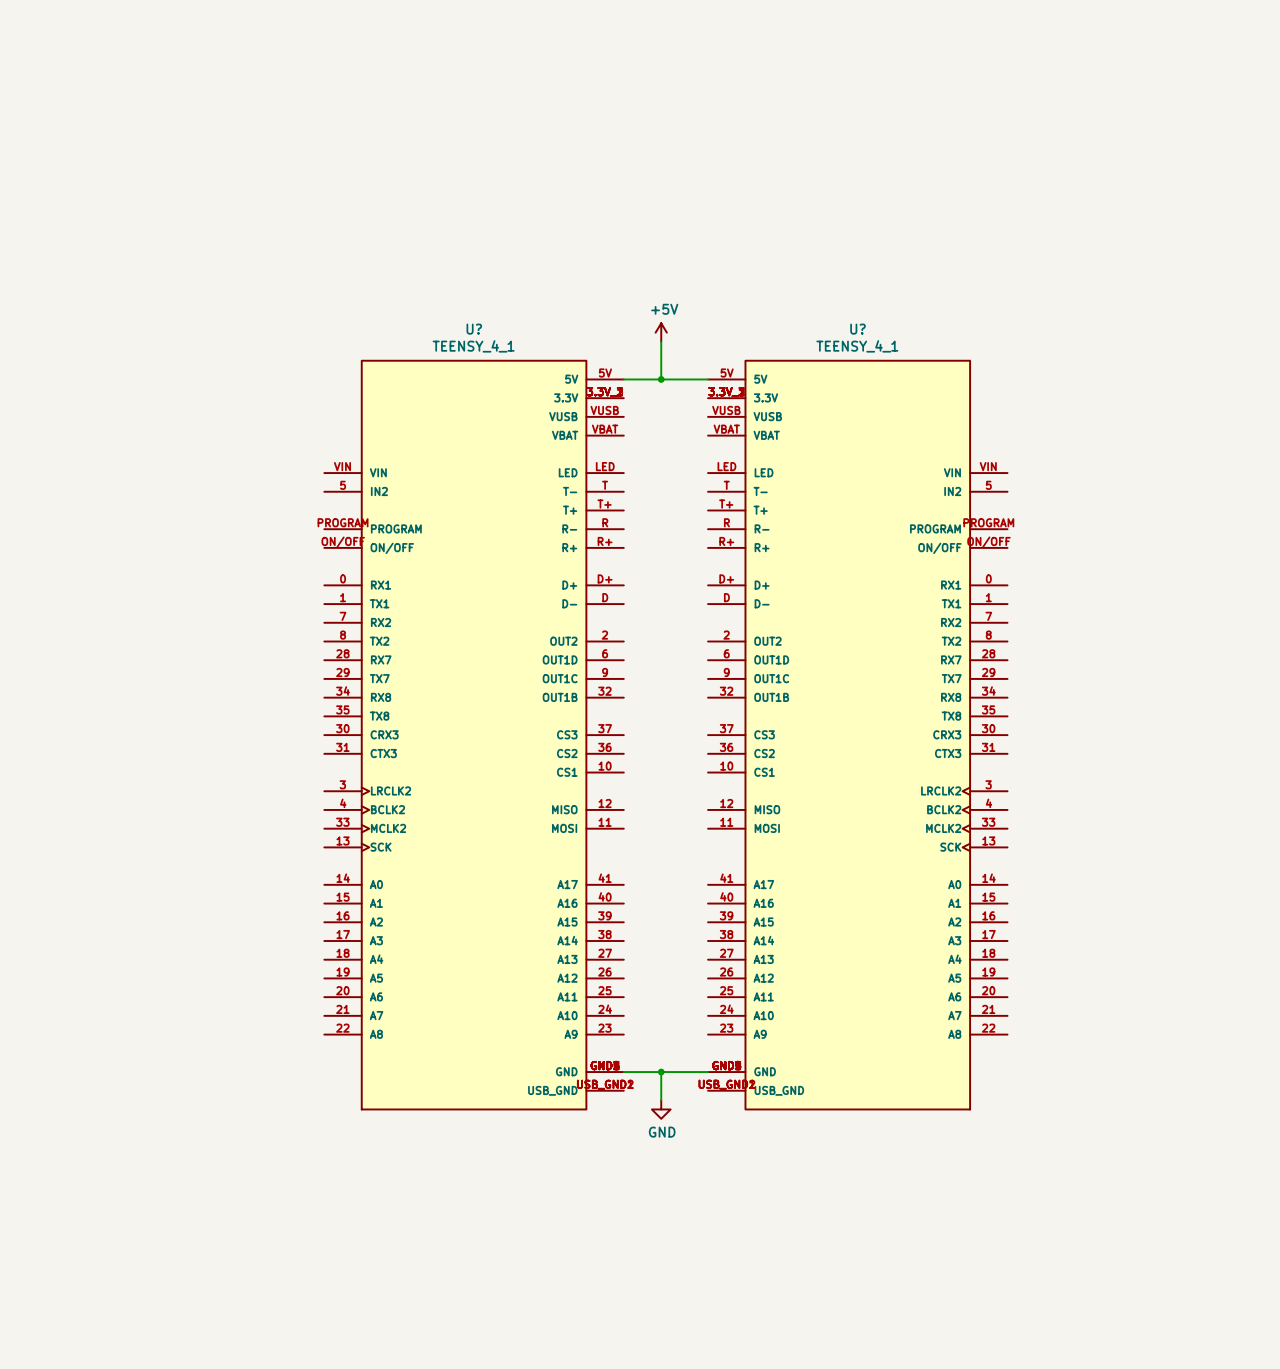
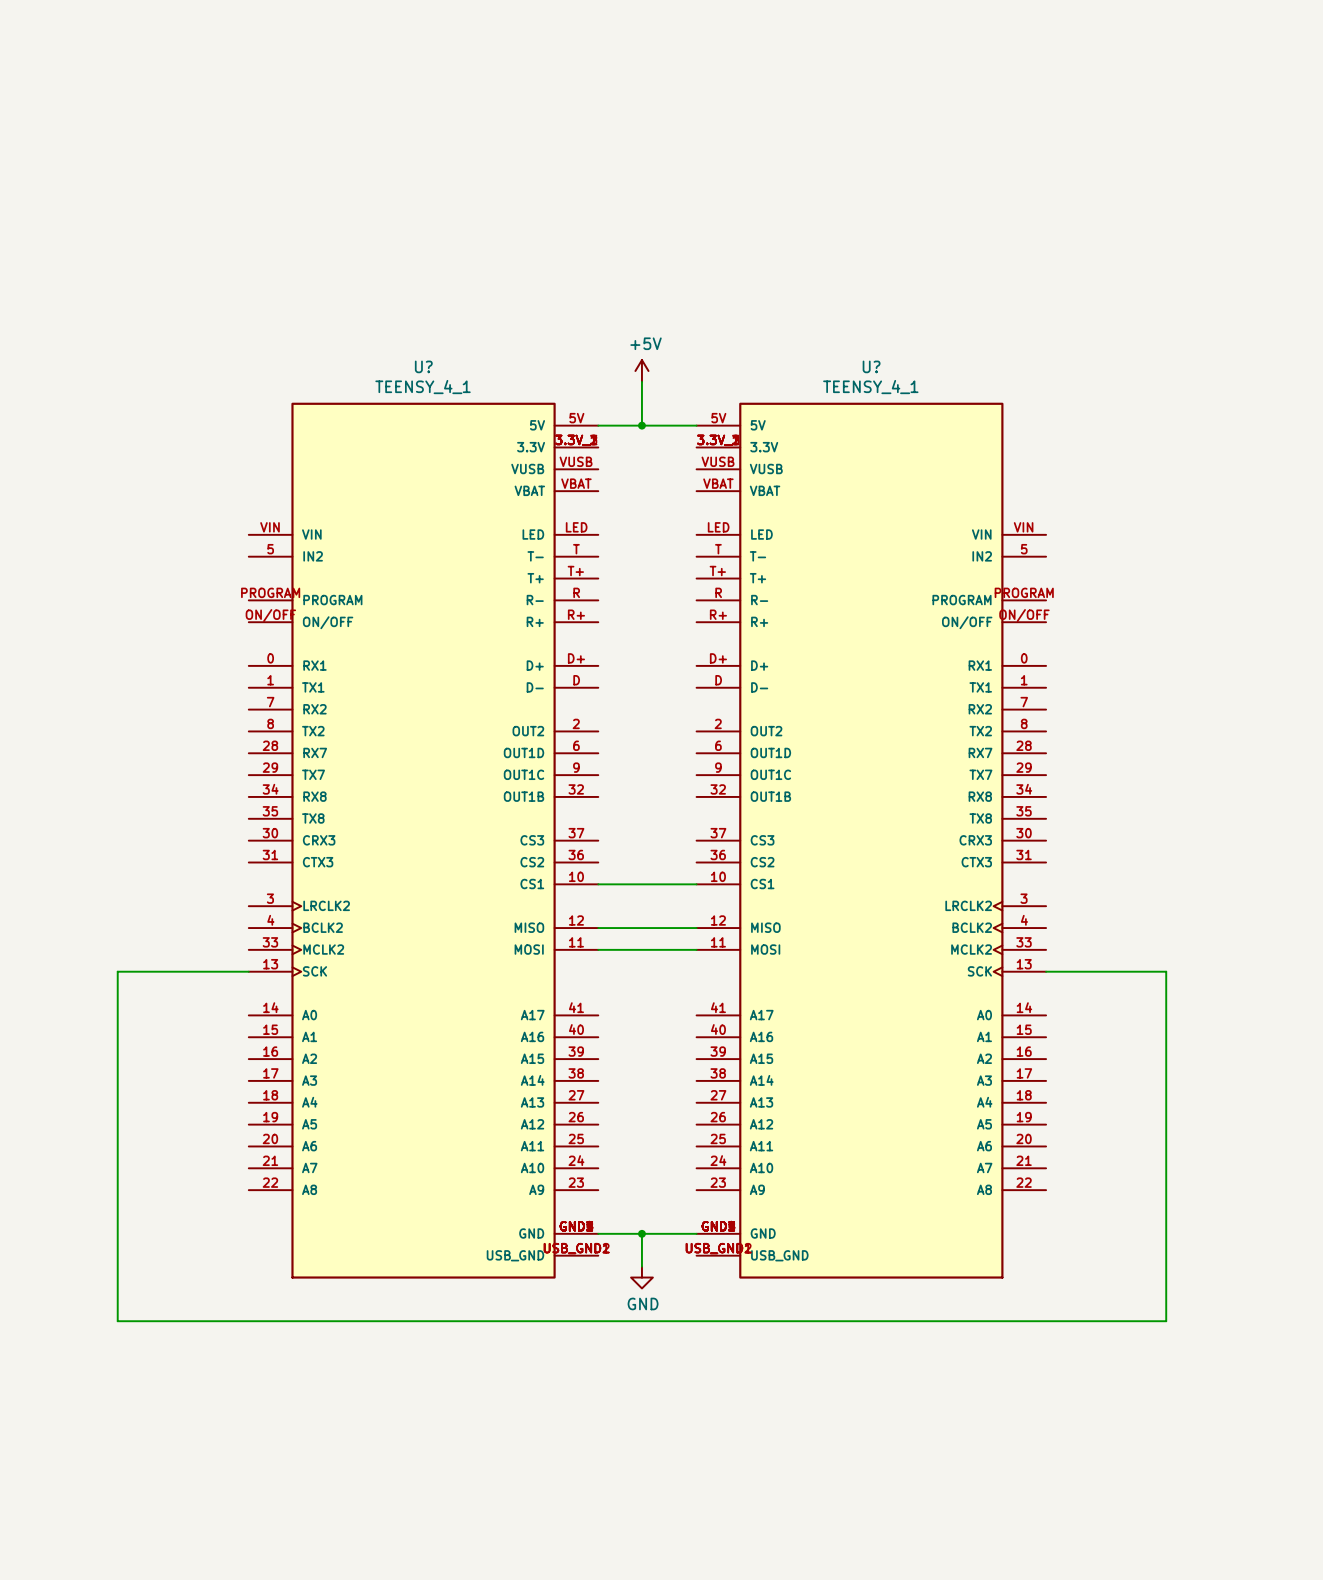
wire: none -> (598, 884) (696, 884)
wire: none -> (598, 928) (696, 928)
wire: none -> (598, 949) (696, 949)
wire: none -> (248, 971) (117, 971) (117, 1321) (1166, 1321) (1166, 971) (1046, 971)

